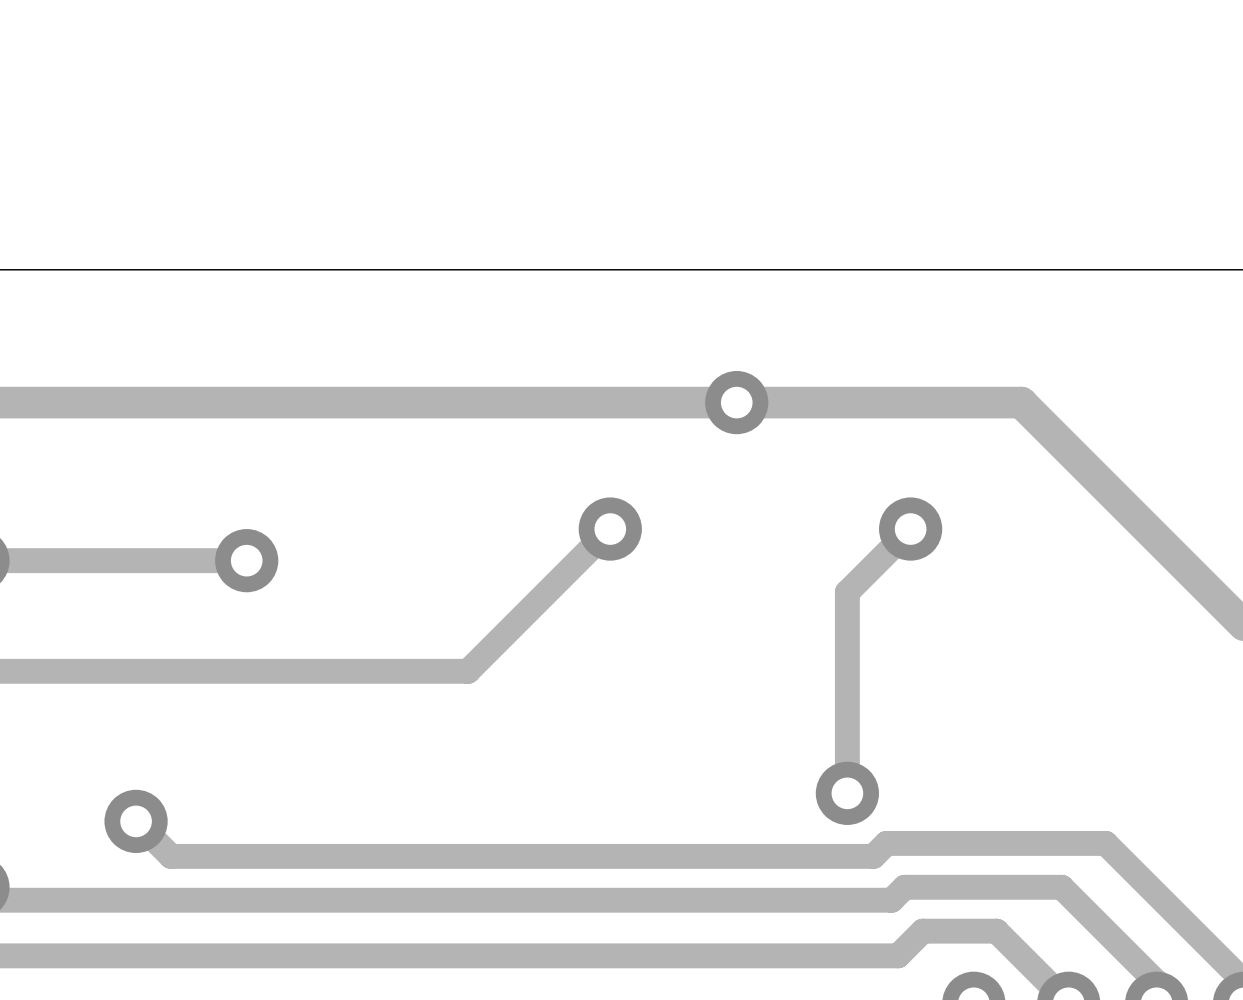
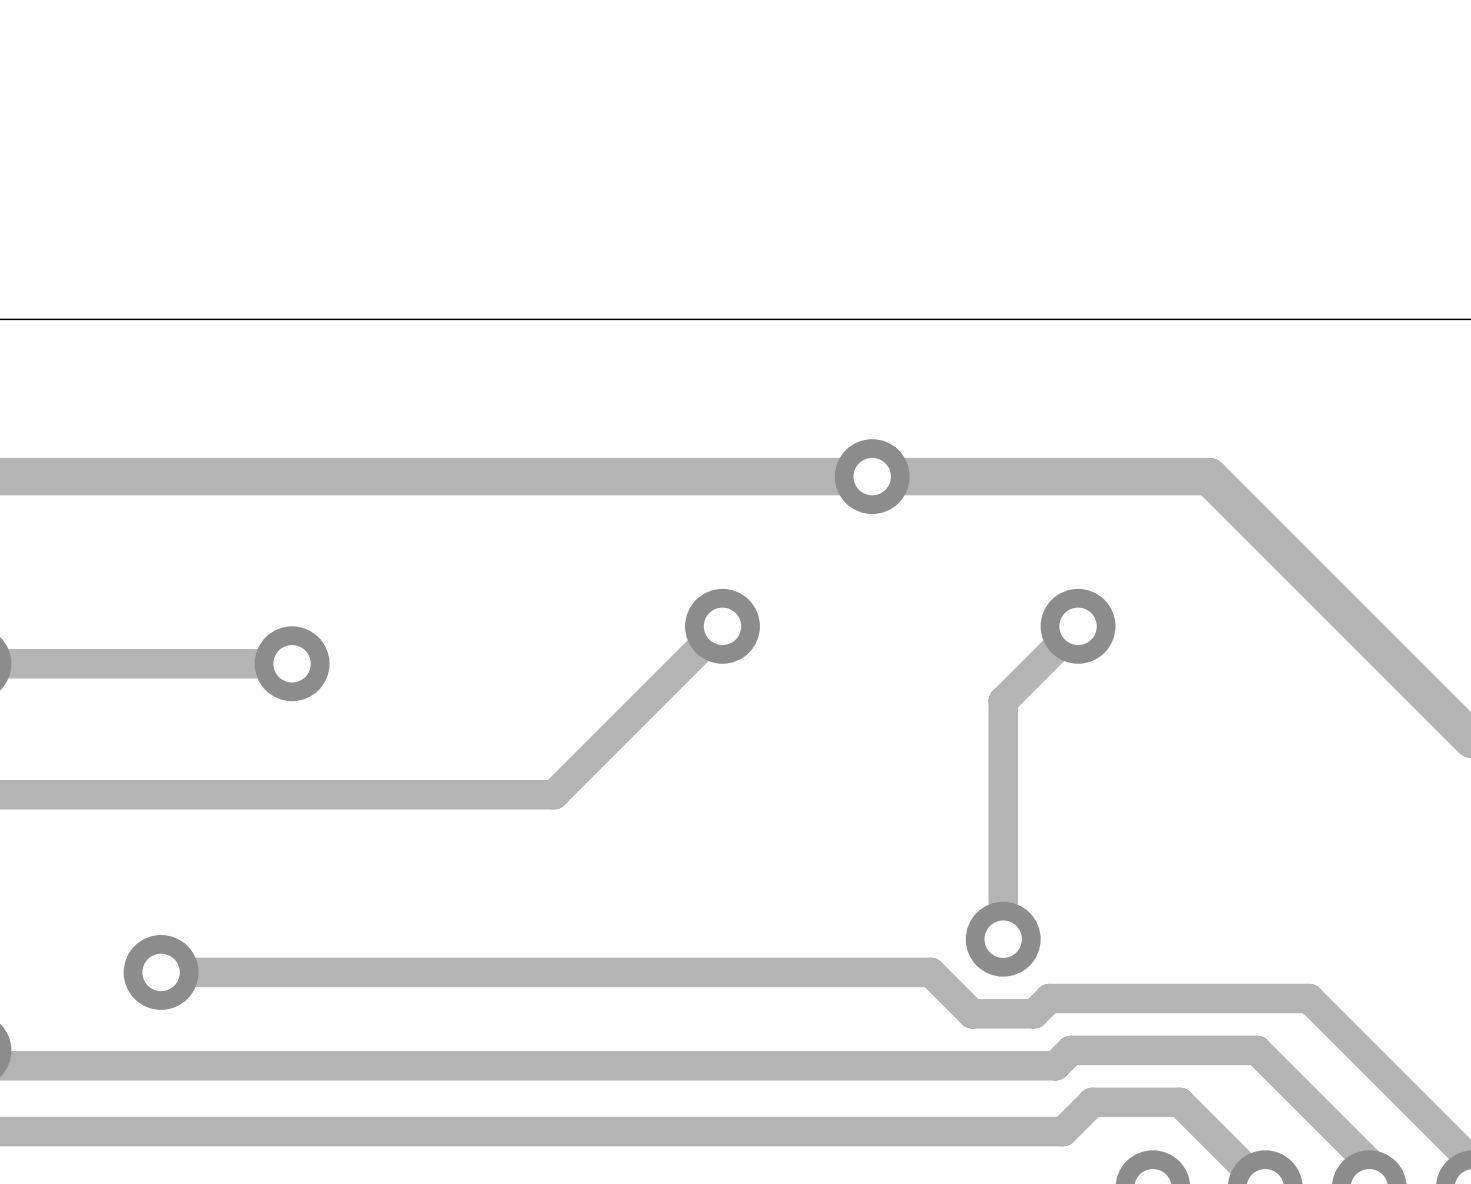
track: (136, 821) (171, 856) (821, 856) -> (161, 972) (930, 972) (972, 1013)

